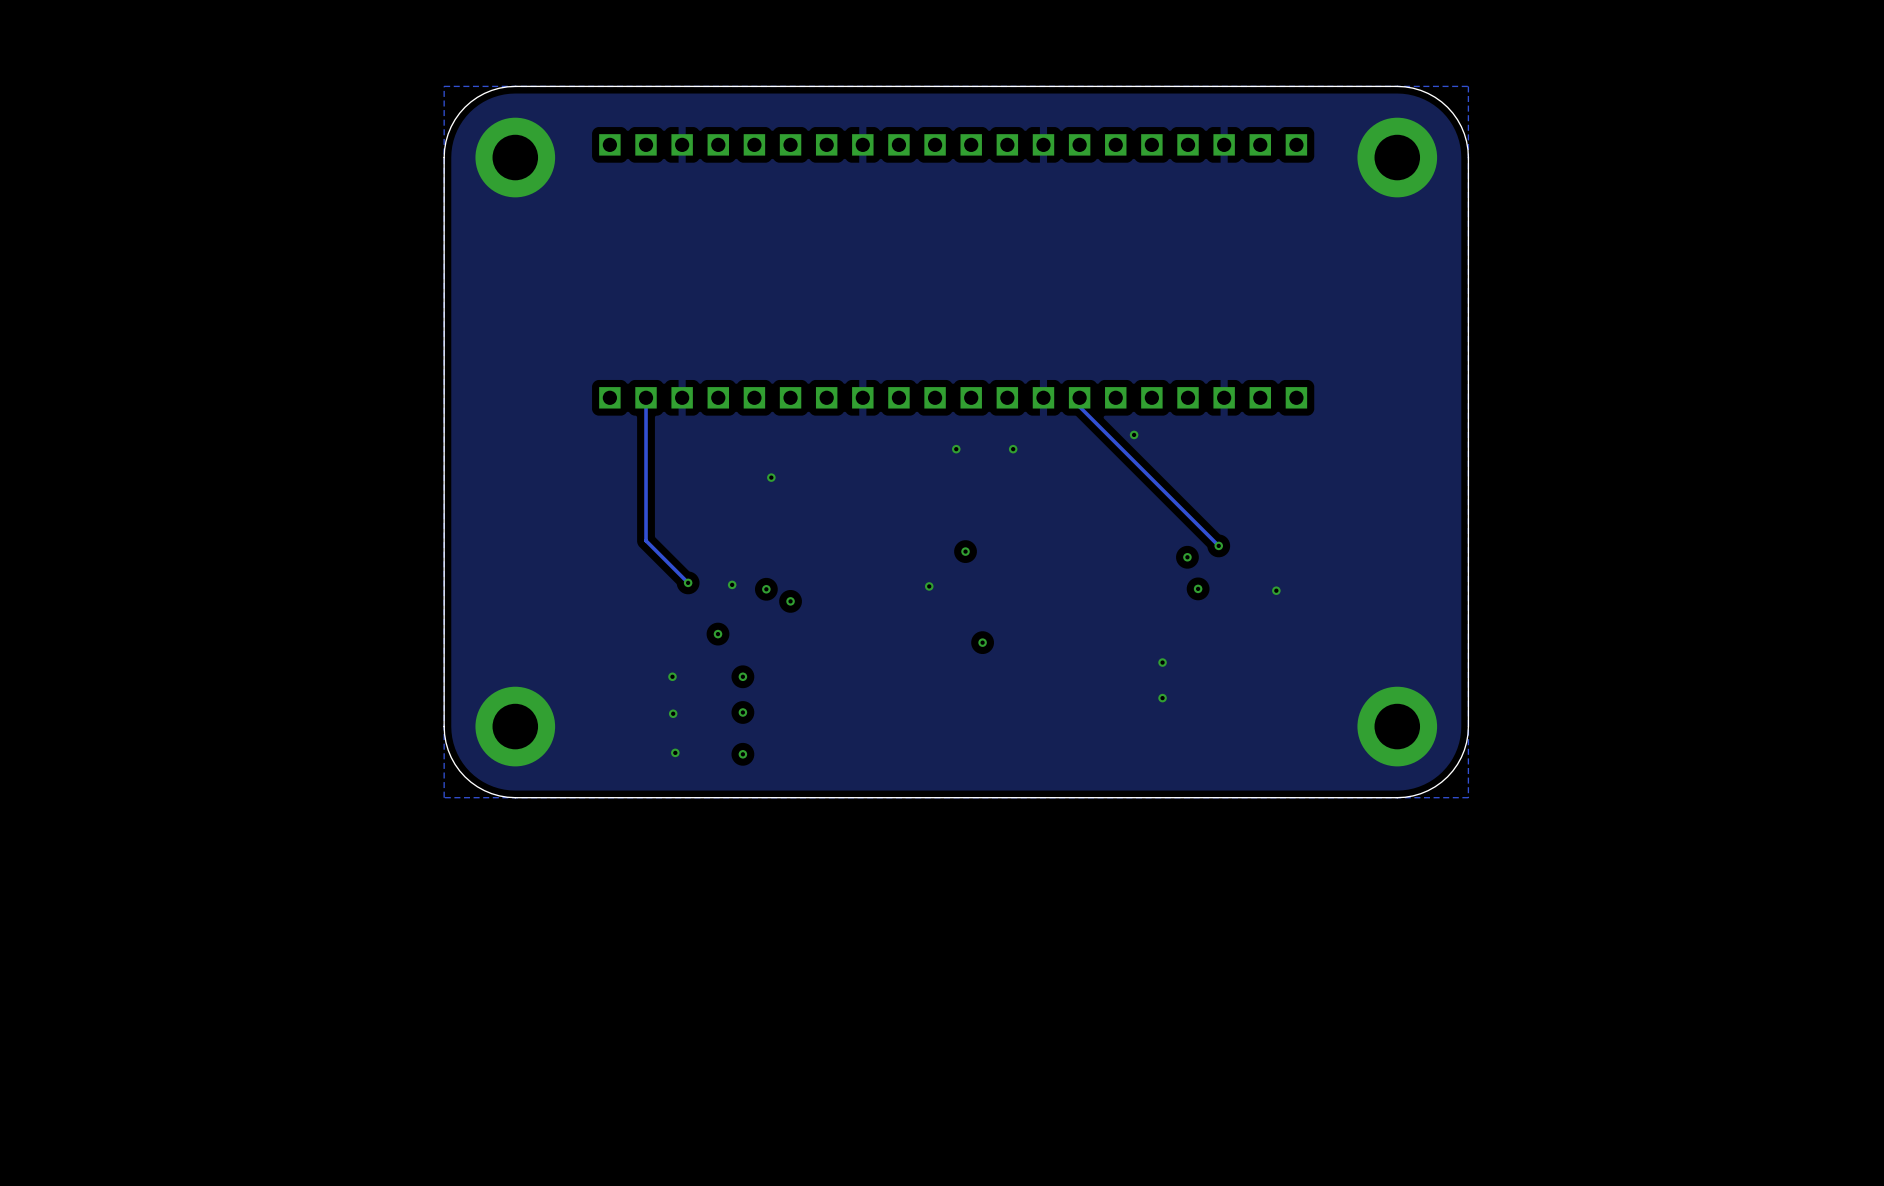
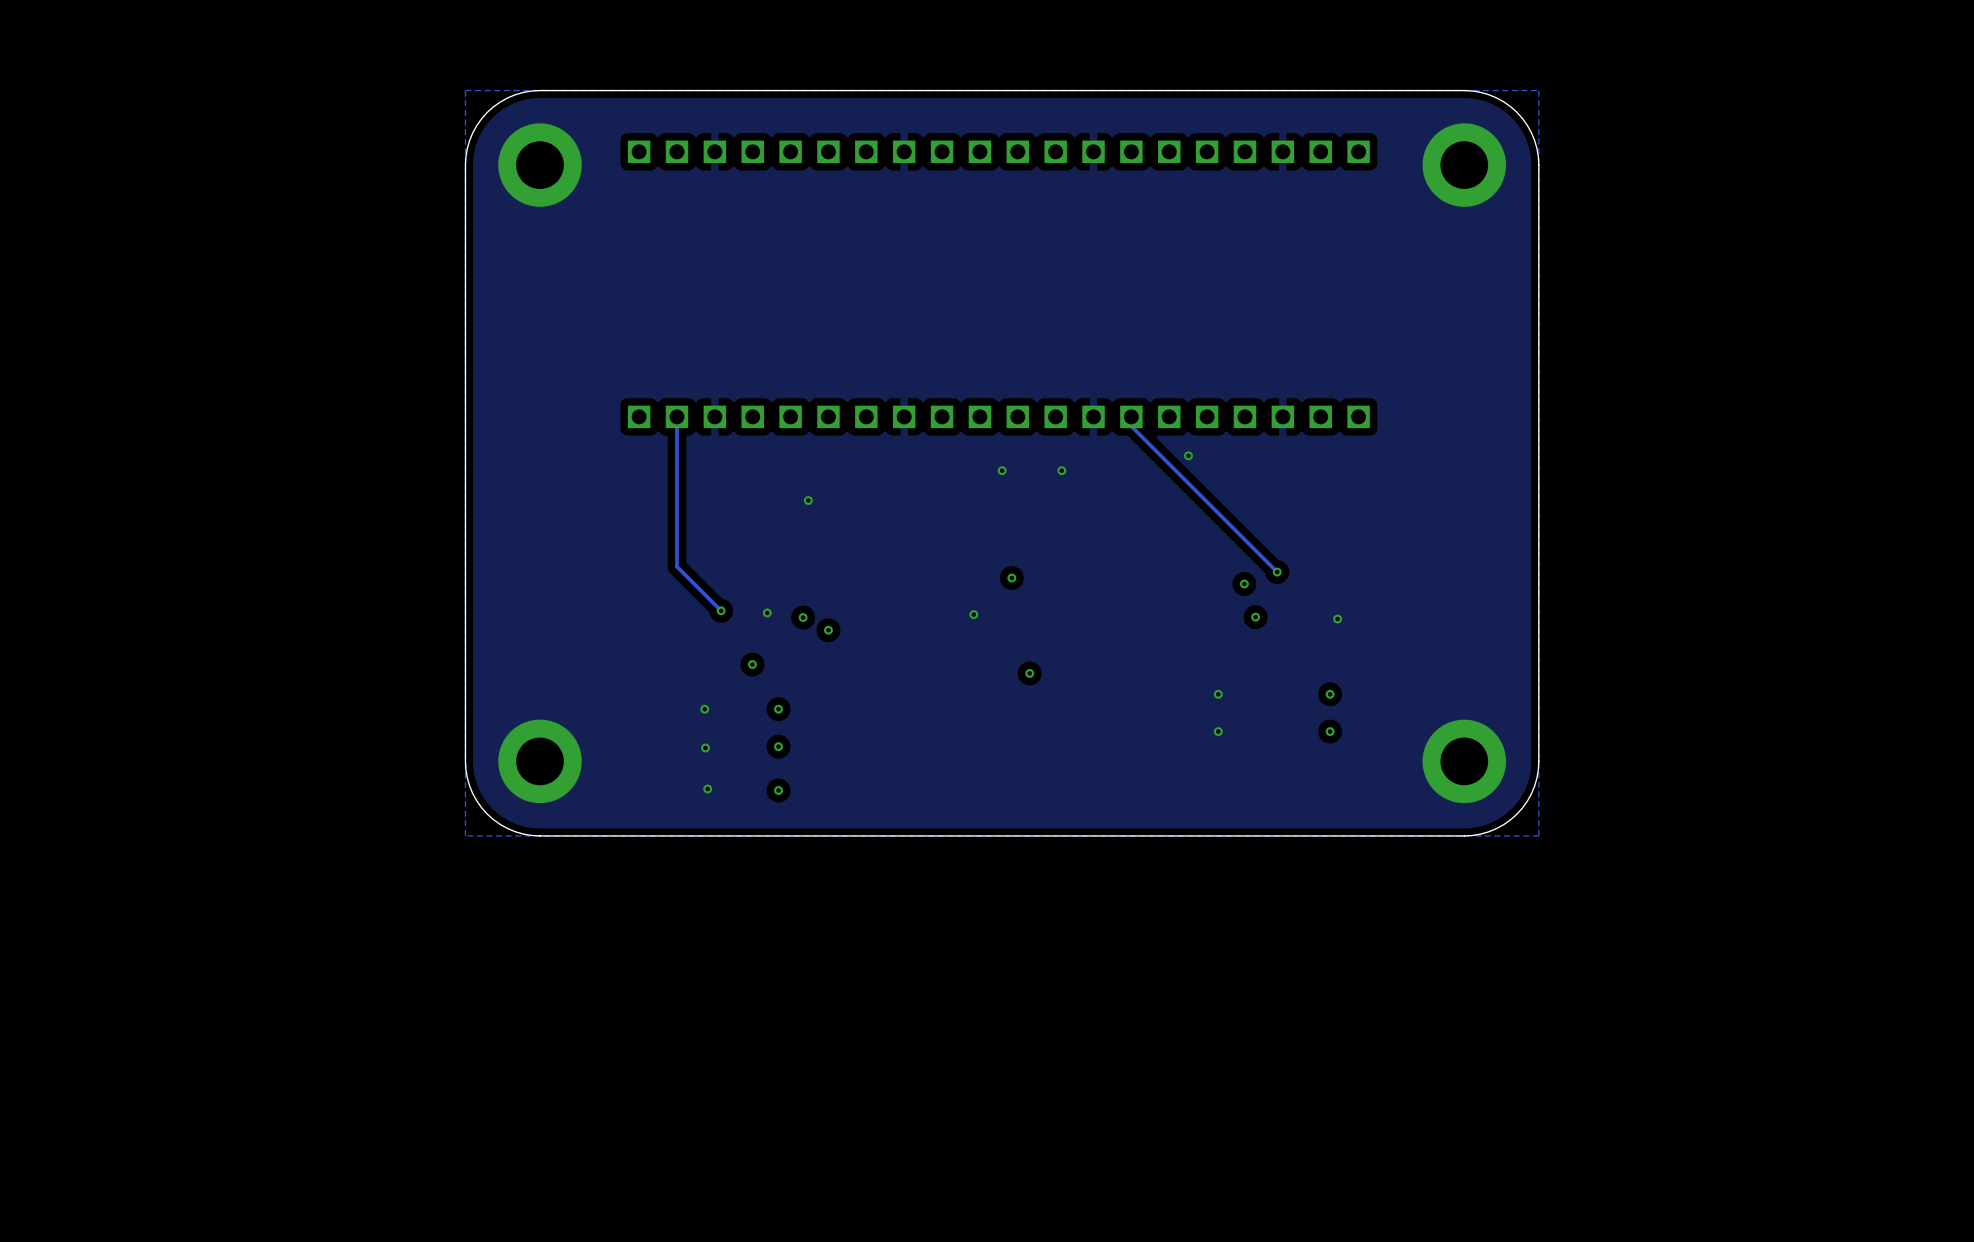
via: none -> (1330, 694)
via: none -> (1330, 731)

